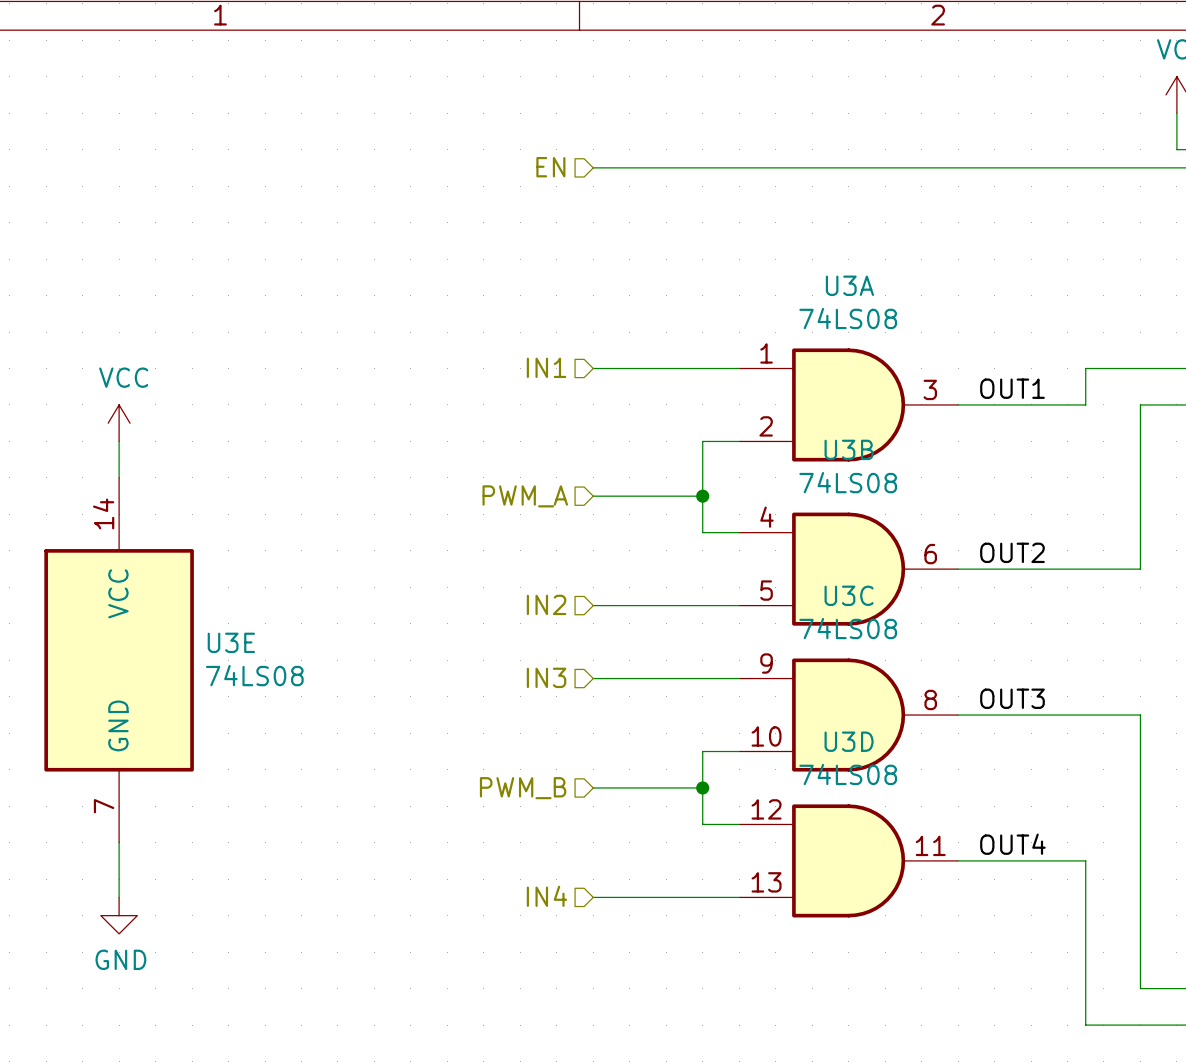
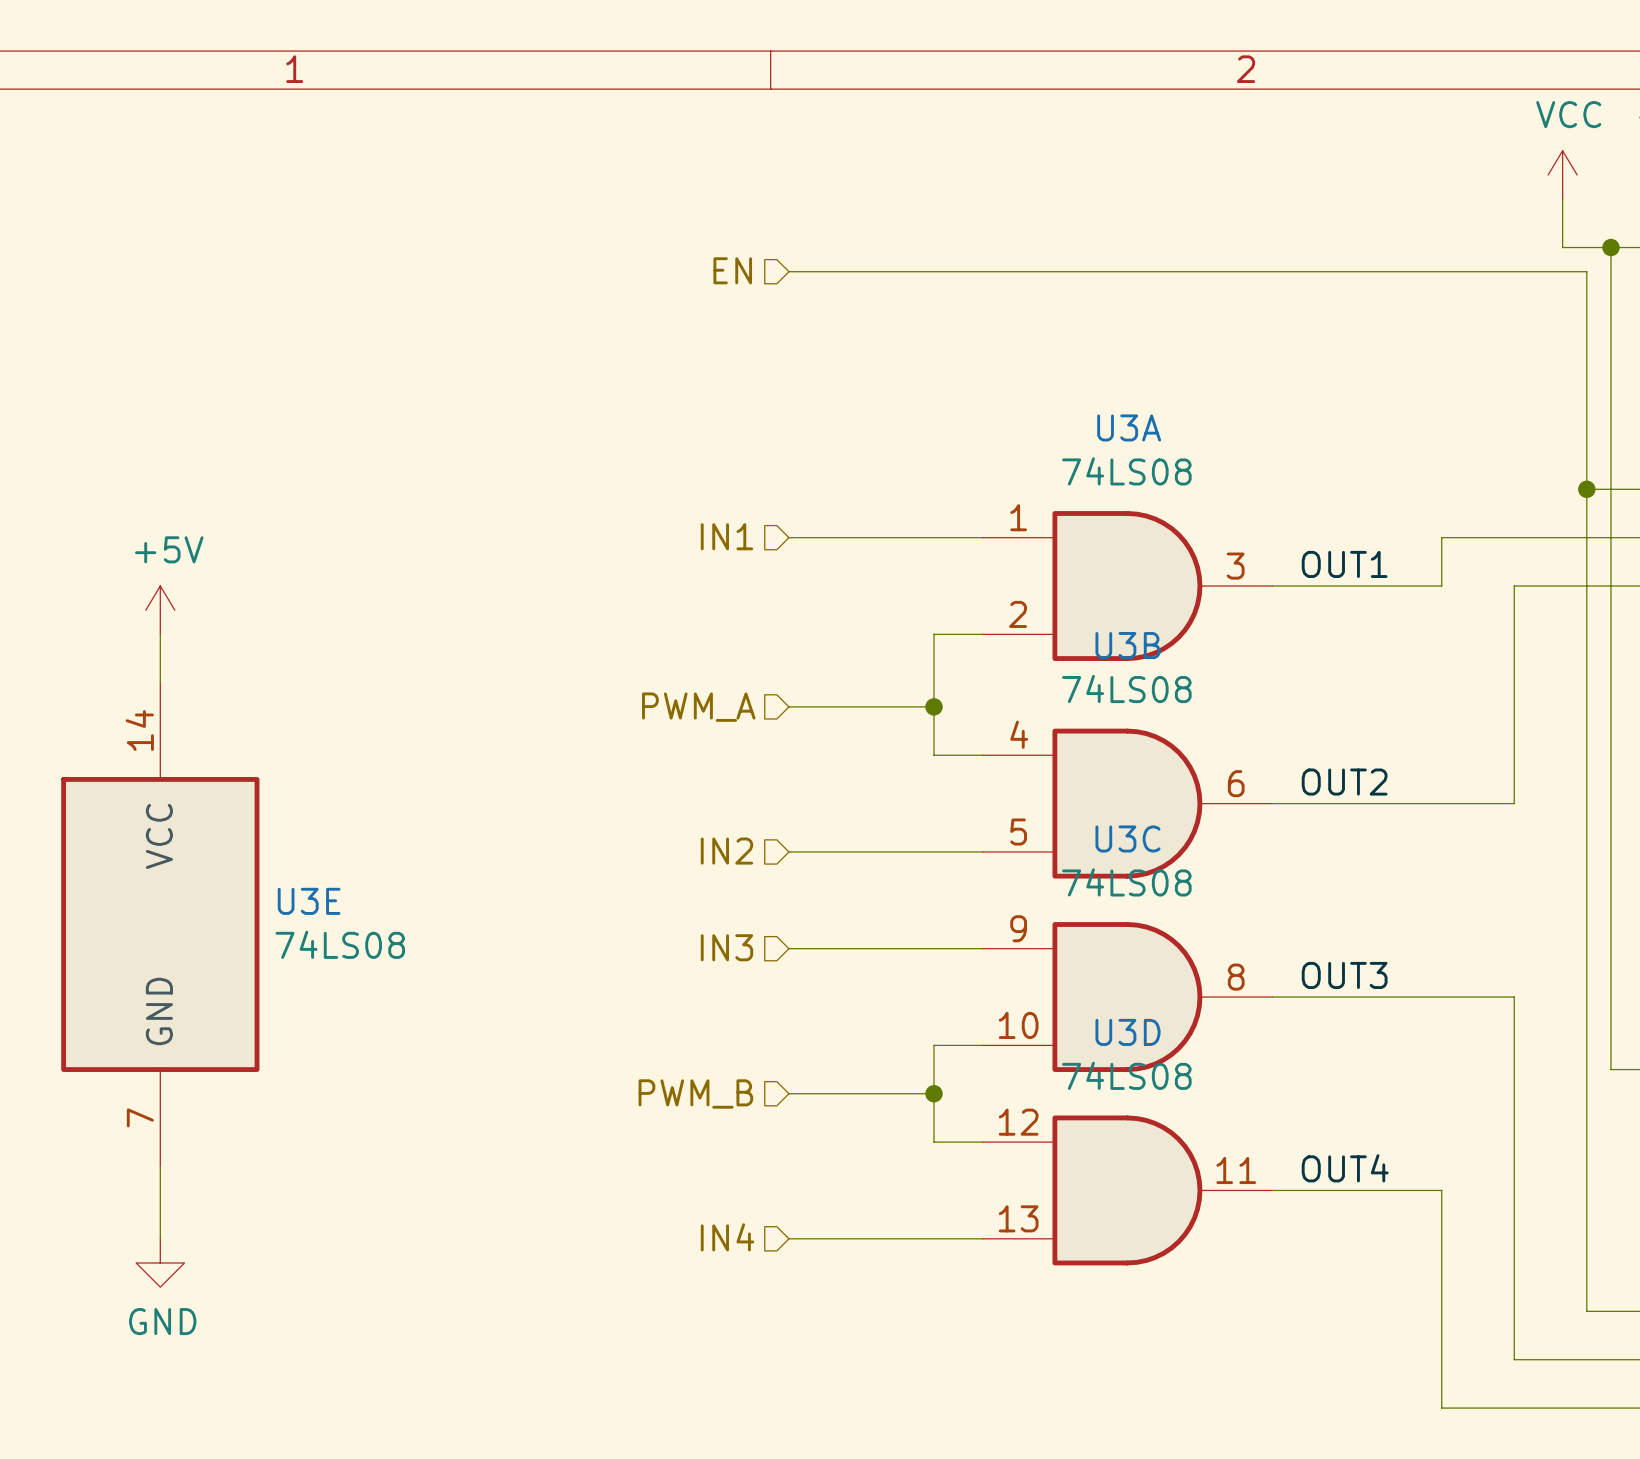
power symbol: VCC (119, 423) -> +5V (160, 610)

